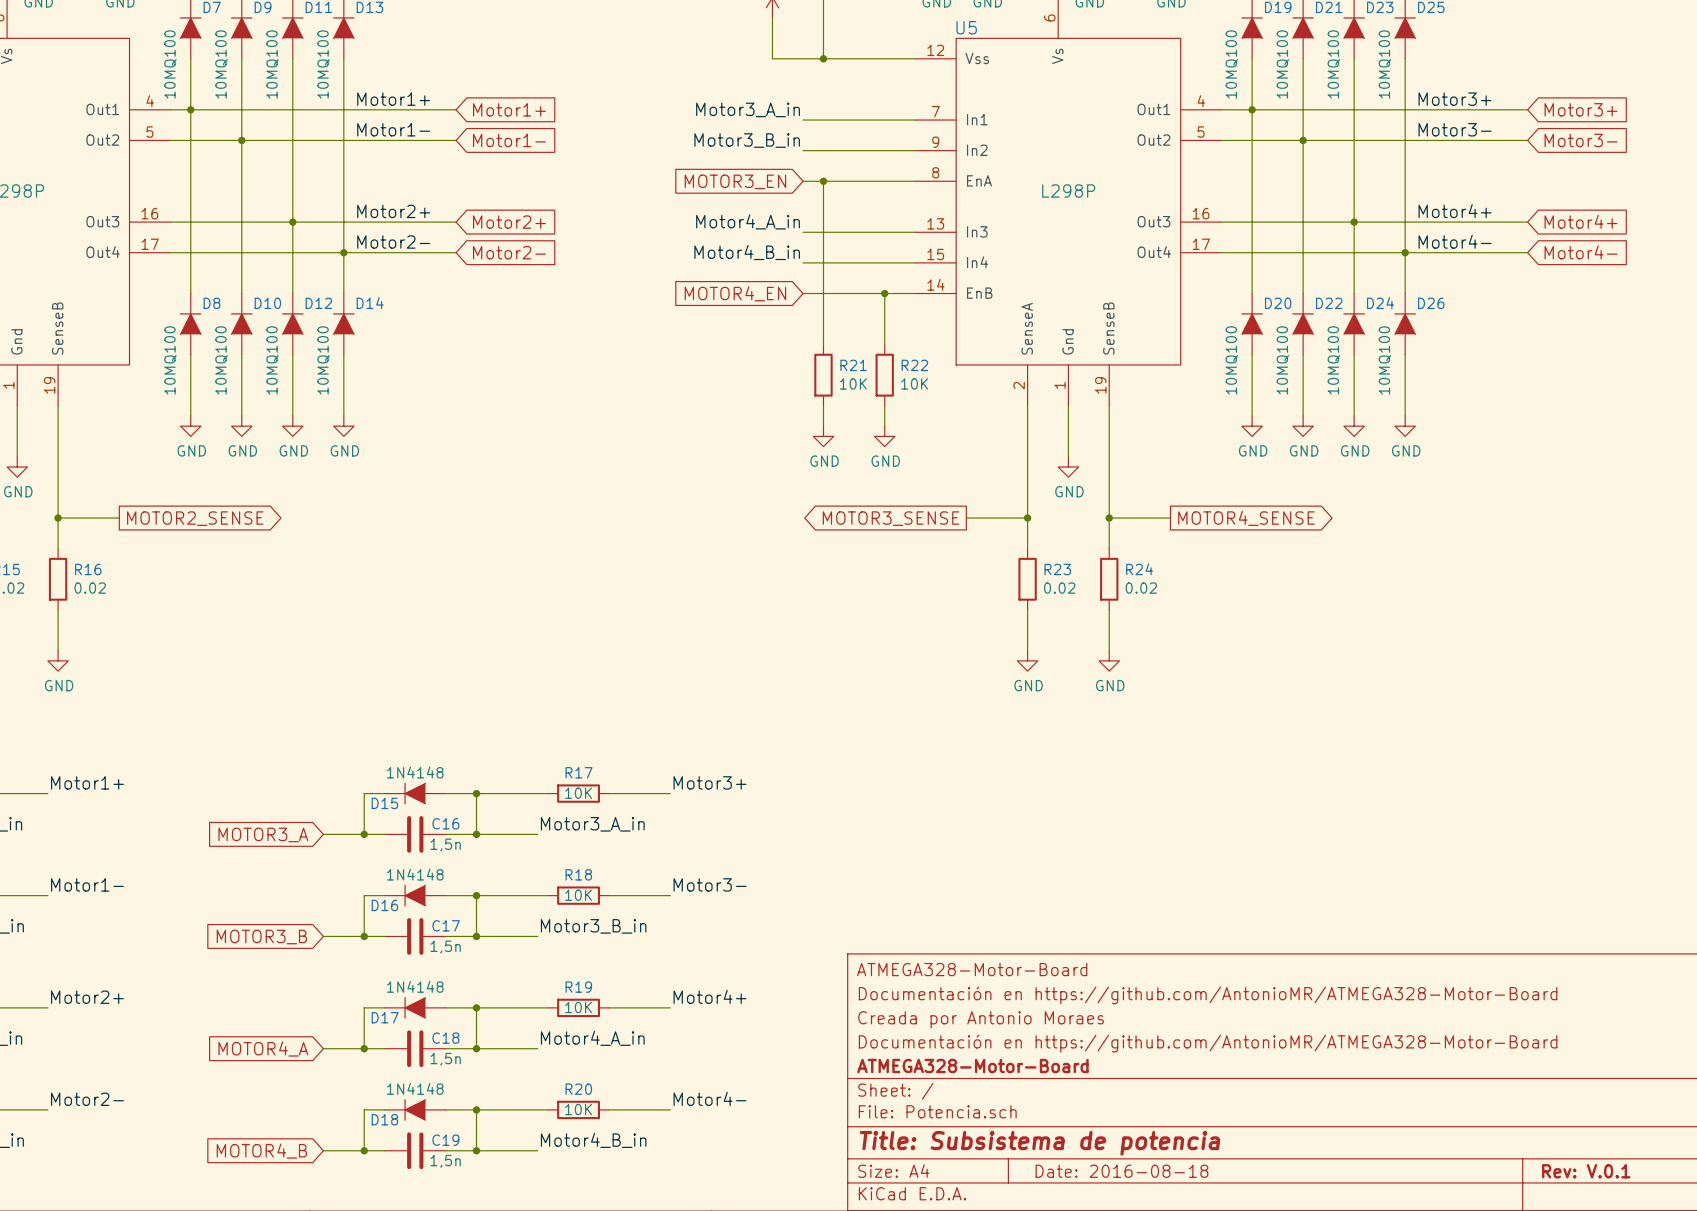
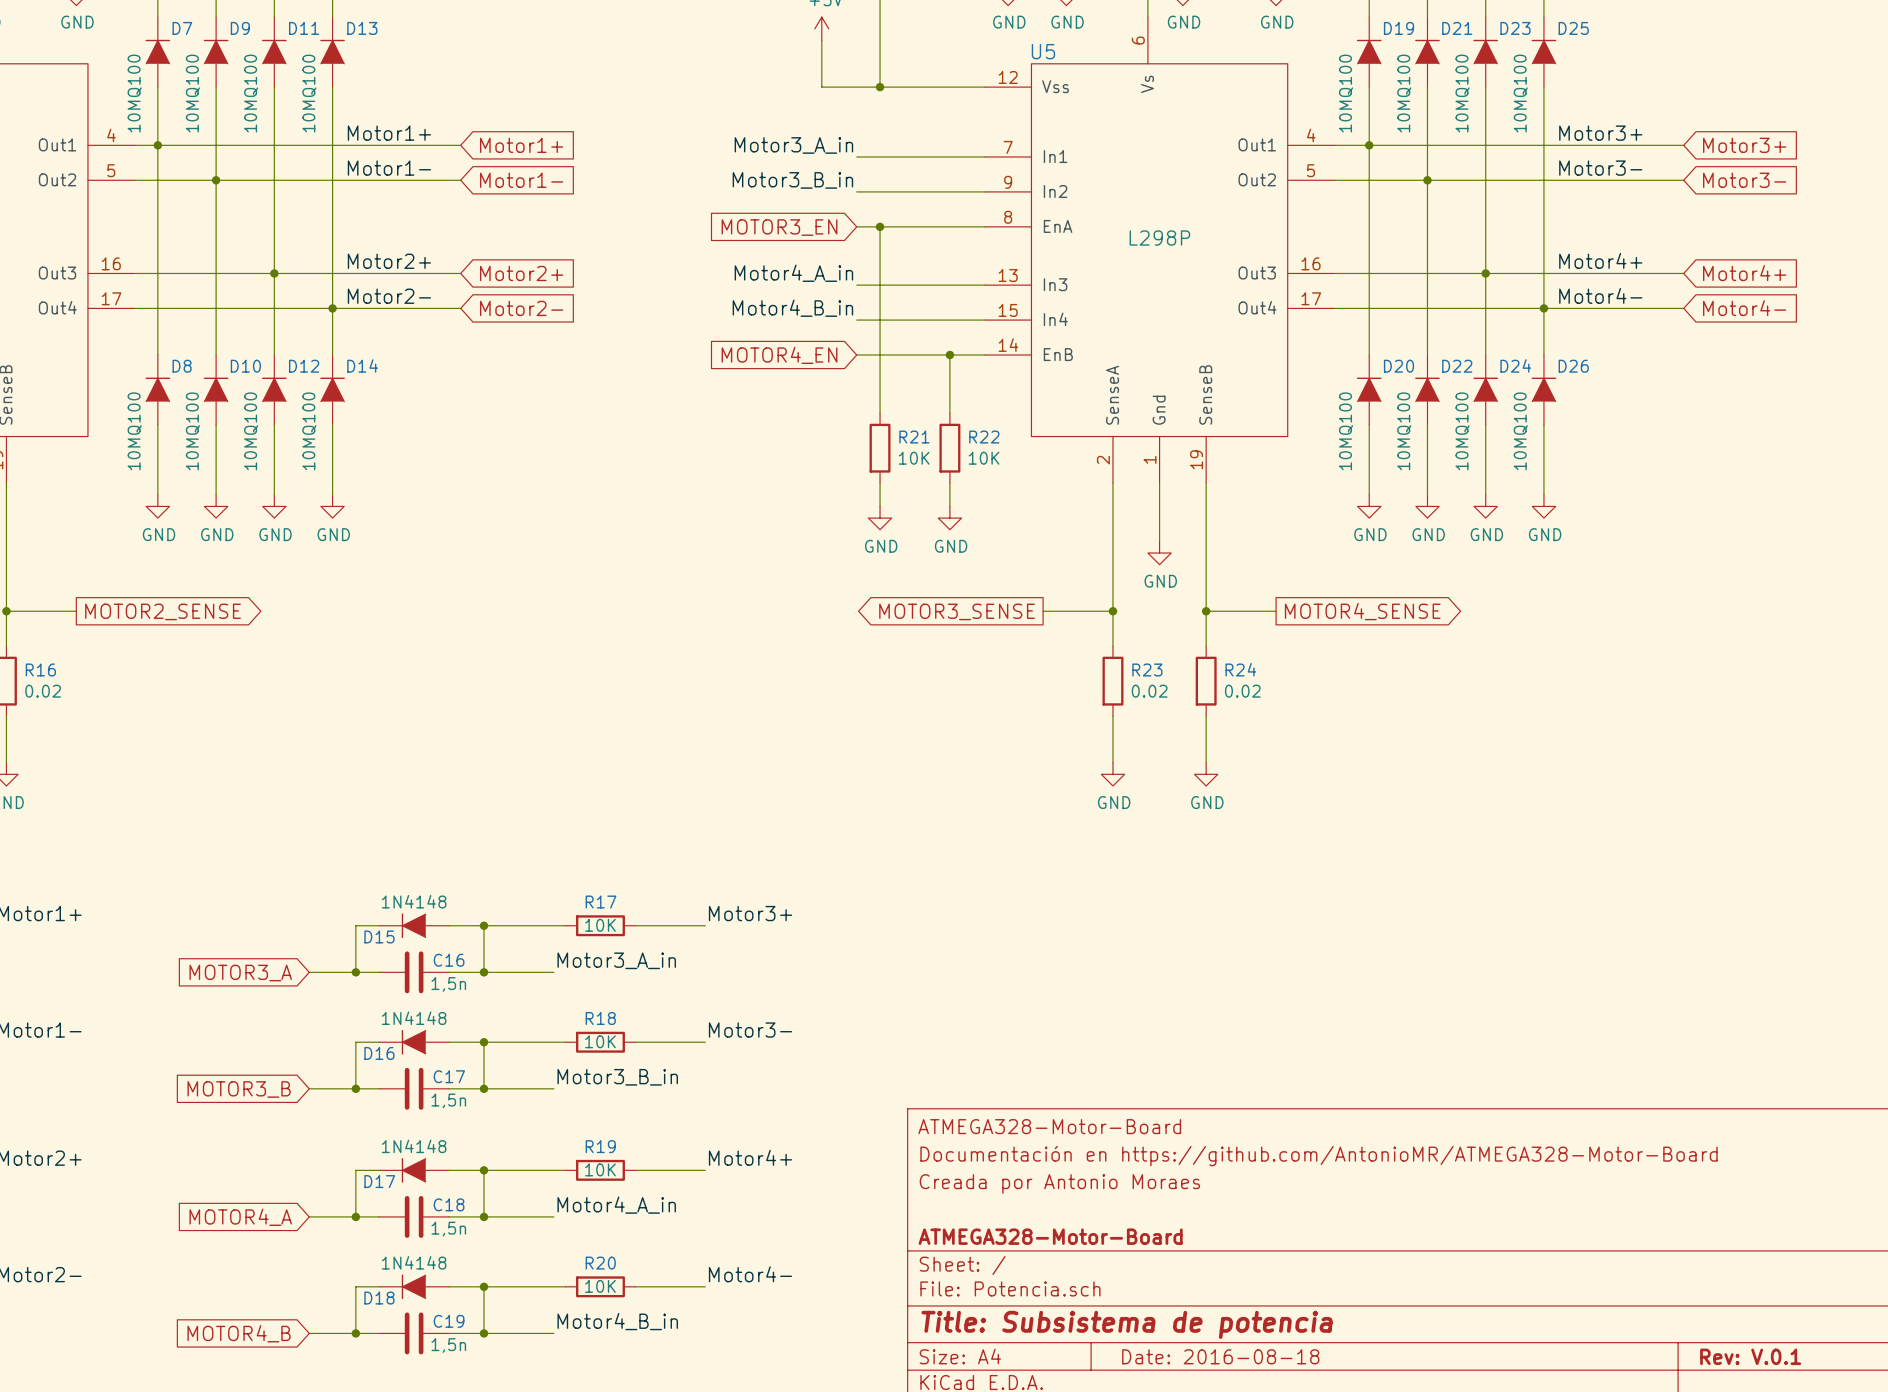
title block: Documentación en https://github.com/AntonioMR/ATMEGA328-Motor-Board (1208, 1043) -> none

